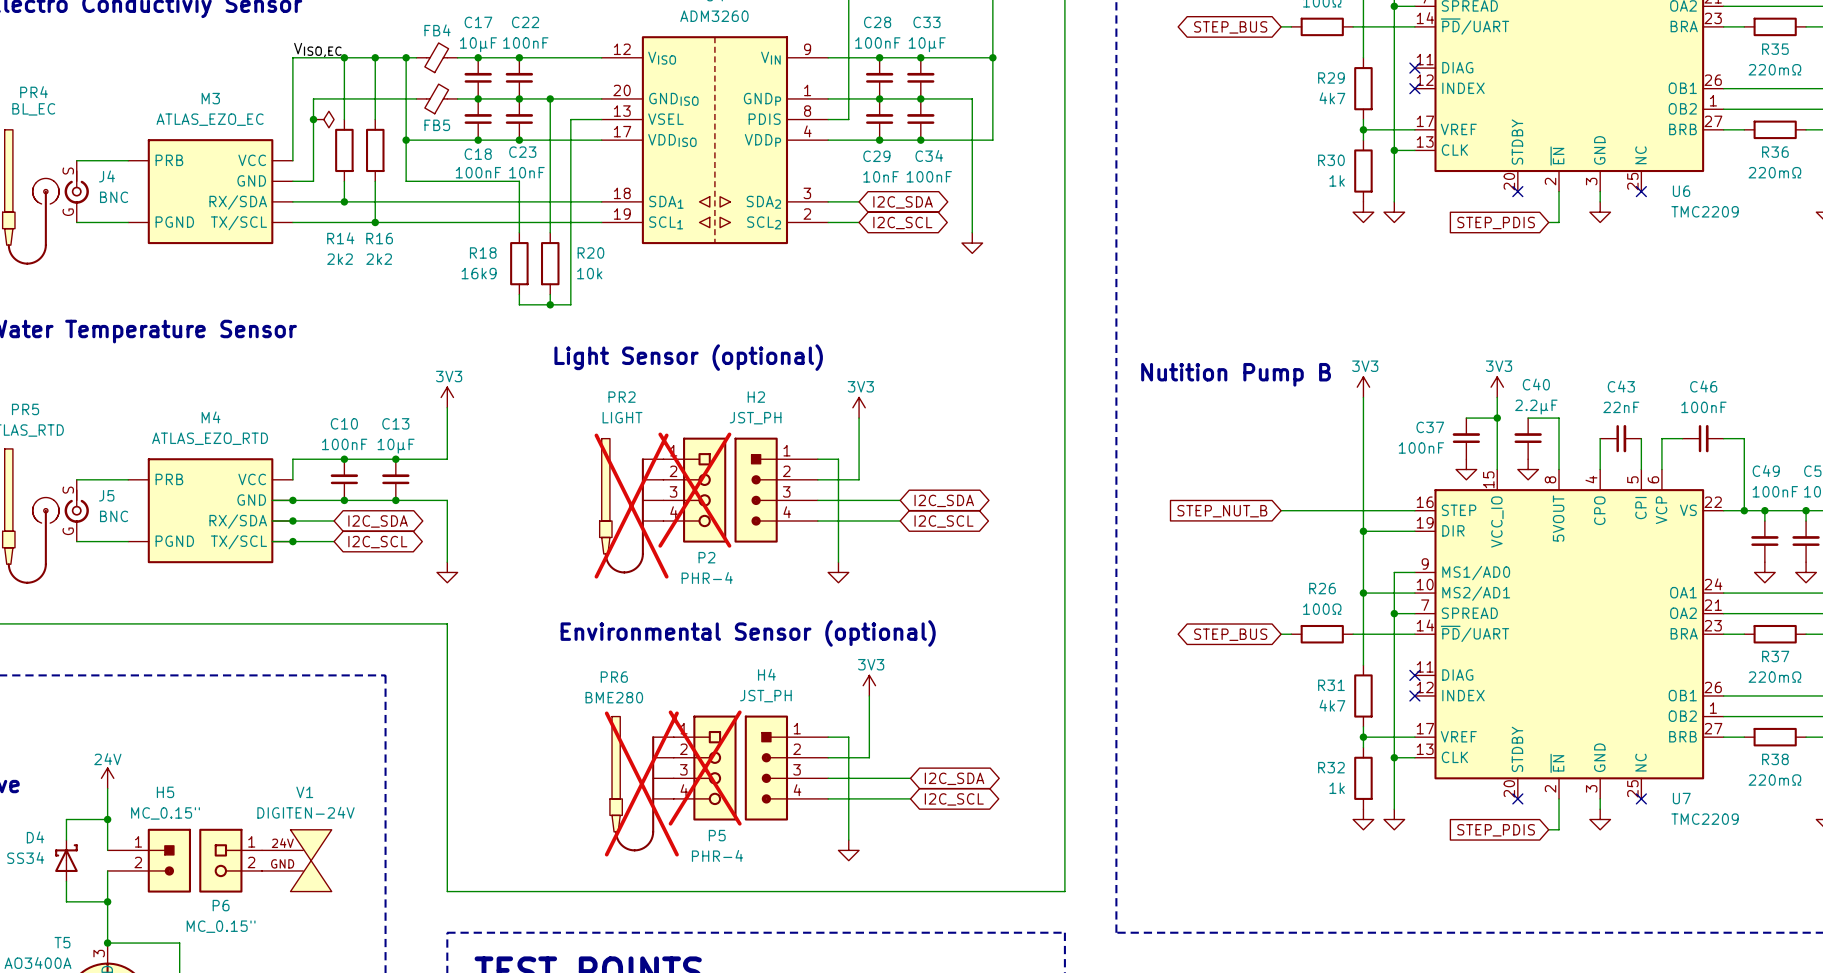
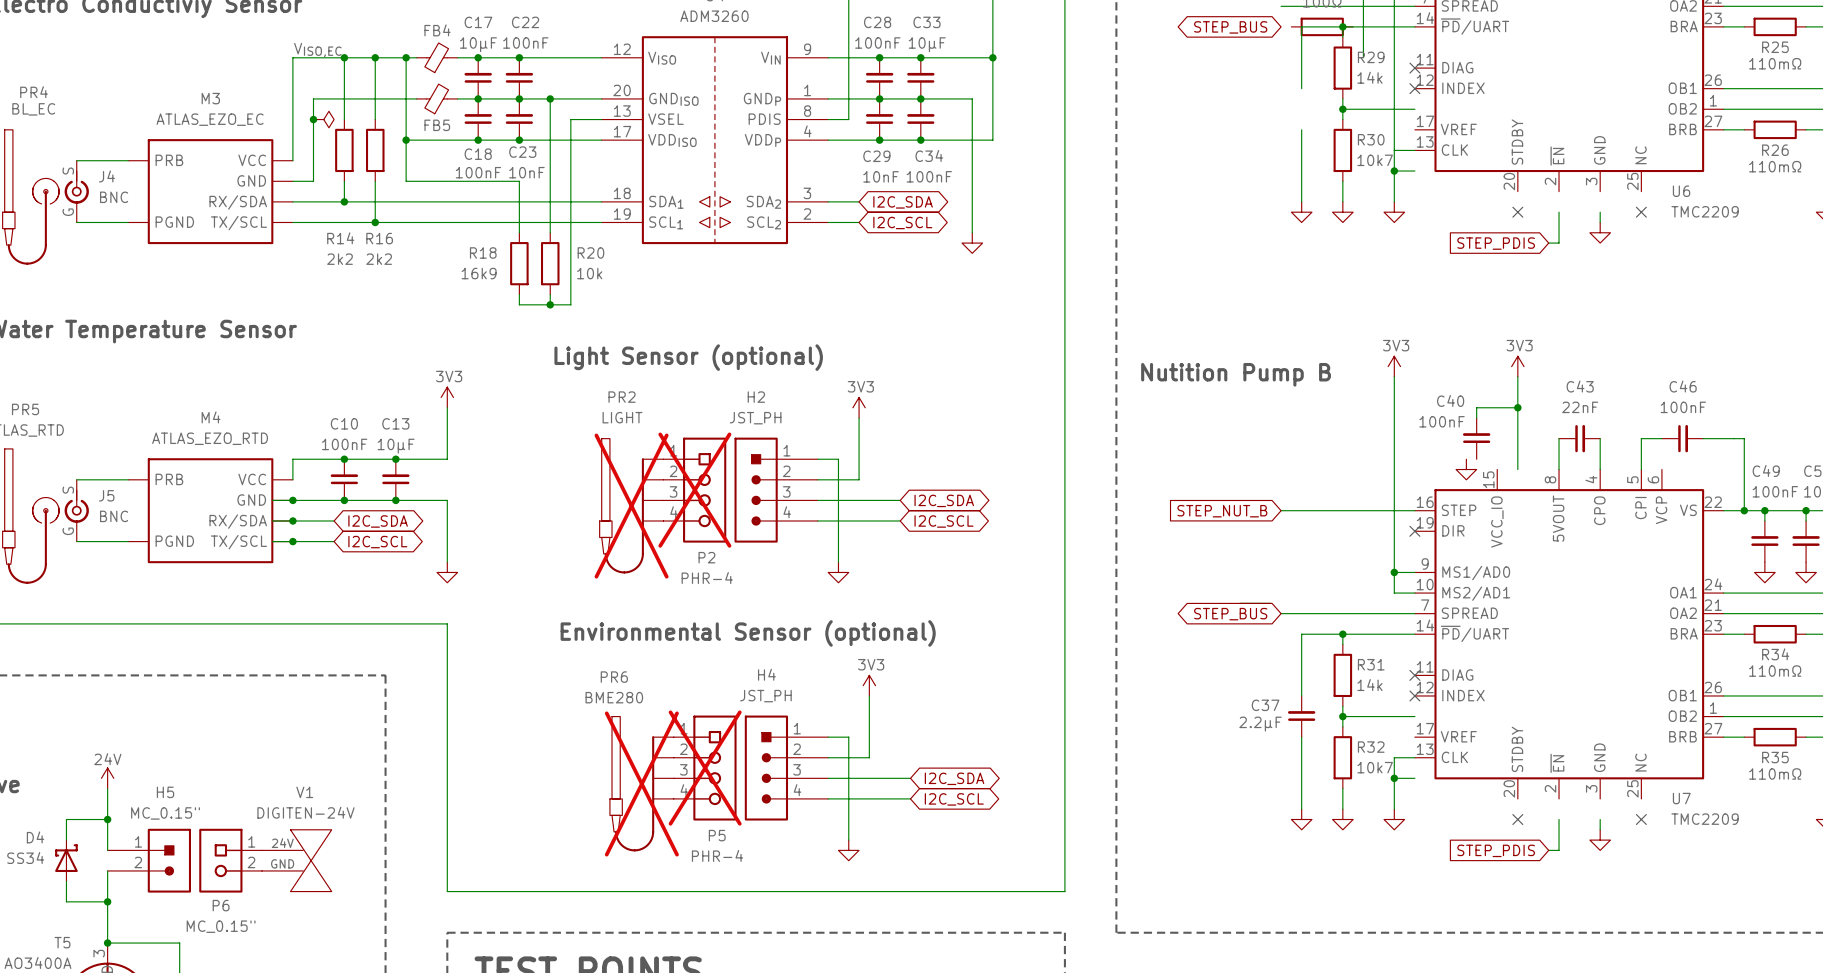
wire: none -> (1281, 6) (1394, 6)
junction: (1394, 6) -> none
wire: (1281, 26) (1291, 26) -> none
junction: none -> (1342, 26)
wire: none -> (1353, 26) (1301, 26) (1301, 88)
R35 name: R35 (1775, 49) -> R25 (1775, 47)
R35 value: 220mΩ (1774, 69) -> 110mΩ (1775, 63)
R29 name position: R29 (1331, 77) -> R29 (1371, 57)
R29 position: (1363, 88) -> (1342, 68)
R29 value: 4k7 (1332, 98) -> 14k (1369, 77)
wire: none -> (1342, 109) (1414, 109)
junction: none -> (1342, 109)
wire: (1363, 119) (1363, 140) -> (1342, 98) (1342, 119)
wire: none -> (1301, 129) (1301, 201)
wire: (1363, 129) (1414, 129) -> none
junction: (1363, 129) -> none
junction position: (1394, 150) -> (1394, 171)
R36 name: R36 (1775, 152) -> R26 (1775, 150)
R30 name position: R30 (1331, 160) -> R30 (1371, 139)
R30 position: (1363, 171) -> (1342, 150)
wire: none -> (1394, 171) (1414, 171)
R36 value: 220mΩ (1774, 172) -> 110mΩ (1775, 166)
R30 value: 1k (1337, 180) -> 10k7 (1375, 160)
wire: none -> (1342, 181) (1342, 201)
no-connect mark position: (1517, 191) -> (1517, 212)
wire: (1559, 191) (1559, 212) -> none
wire: (1600, 191) (1600, 201) -> (1600, 212) (1600, 222)
no-connect mark position: (1641, 191) -> (1641, 212)
power symbol: none -> (1301, 212)
power symbol position: (1363, 212) -> (1342, 212)
power symbol position: (1600, 212) -> (1600, 232)
global label position: STEP_PDIS (1496, 222) -> STEP_PDIS (1496, 243)
wire: (1548, 222) (1559, 222) -> (1548, 243) (1559, 243) (1559, 222)
wire: none -> (1394, 376) (1394, 572)
wire: none -> (1517, 376) (1517, 469)
C40 name position: C40 (1536, 384) -> C40 (1450, 400)
power symbol position: 3V3 (1363, 387) -> 3V3 (1394, 366)
power symbol position: 3V3 (1497, 387) -> 3V3 (1517, 366)
wire: (1363, 397) (1363, 665) -> none
wire: (1497, 397) (1497, 469) -> none
wire: none -> (1517, 407) (1476, 407) (1476, 418)
C40 value: 2.2μF (1536, 407) -> 100nF (1442, 421)
wire: (1466, 418) (1497, 418) -> none
junction position: (1497, 418) -> (1517, 407)
wire: (1528, 418) (1559, 418) (1559, 438) -> none
C37 position: (1466, 438) -> (1301, 716)
C40 position: (1528, 438) -> (1476, 438)
C43 position: (1620, 438) -> (1579, 438)
wire: none -> (1641, 438) (1661, 438)
wire: (1682, 438) (1661, 438) (1661, 469) -> none
C46 position: (1703, 438) -> (1682, 438)
C37 value: 100nF (1421, 447) -> 2.2μF (1260, 724)
power symbol: (1528, 469) -> none
wire: (1363, 531) (1414, 531) -> none
junction: (1363, 531) -> none
no-connect mark: none -> (1414, 531)
junction: none -> (1394, 572)
wire: (1363, 593) (1394, 593) (1394, 757) -> none
junction: (1363, 593) -> none
wire: none -> (1281, 613) (1394, 613)
junction: (1394, 613) -> none
global label position: STEP_BUS (1230, 634) -> STEP_BUS (1230, 614)
wire: (1281, 634) (1291, 634) -> none
R26: 100Ω (1322, 634) -> none
junction: none -> (1342, 634)
wire: none -> (1353, 634) (1301, 634) (1301, 695)
R37 name: R37 (1775, 656) -> R34 (1775, 654)
R37 value: 220mΩ (1774, 677) -> 110mΩ (1775, 671)
R31 name position: R31 (1331, 685) -> R31 (1371, 664)
R31 position: (1363, 695) -> (1342, 675)
R31 value: 4k7 (1332, 705) -> 14k (1369, 685)
wire: none -> (1342, 716) (1414, 716)
junction: none -> (1342, 716)
wire: (1363, 726) (1363, 747) -> (1342, 706) (1342, 726)
wire: none -> (1301, 737) (1301, 809)
wire: (1363, 737) (1414, 737) -> none
junction: (1363, 737) -> none
junction position: (1394, 757) -> (1394, 778)
R38 name: R38 (1775, 759) -> R35 (1775, 757)
R32 name position: R32 (1331, 767) -> R32 (1371, 747)
R32 position: (1363, 778) -> (1342, 757)
wire: none -> (1394, 778) (1414, 778)
R38 value: 220mΩ (1774, 780) -> 110mΩ (1775, 773)
R32 value: 1k (1337, 788) -> 10k7 (1375, 767)
wire: none -> (1342, 788) (1342, 809)
no-connect mark position: (1517, 798) -> (1517, 819)
wire: (1559, 798) (1559, 819) -> none
wire: (1600, 798) (1600, 809) -> (1600, 819) (1600, 829)
no-connect mark position: (1641, 798) -> (1641, 819)
power symbol: none -> (1301, 819)
power symbol position: (1363, 819) -> (1342, 819)
power symbol position: (1600, 819) -> (1600, 840)
wire: (1548, 829) (1559, 829) -> (1548, 850) (1559, 850) (1559, 829)
global label position: STEP_PDIS (1496, 830) -> STEP_PDIS (1496, 850)

